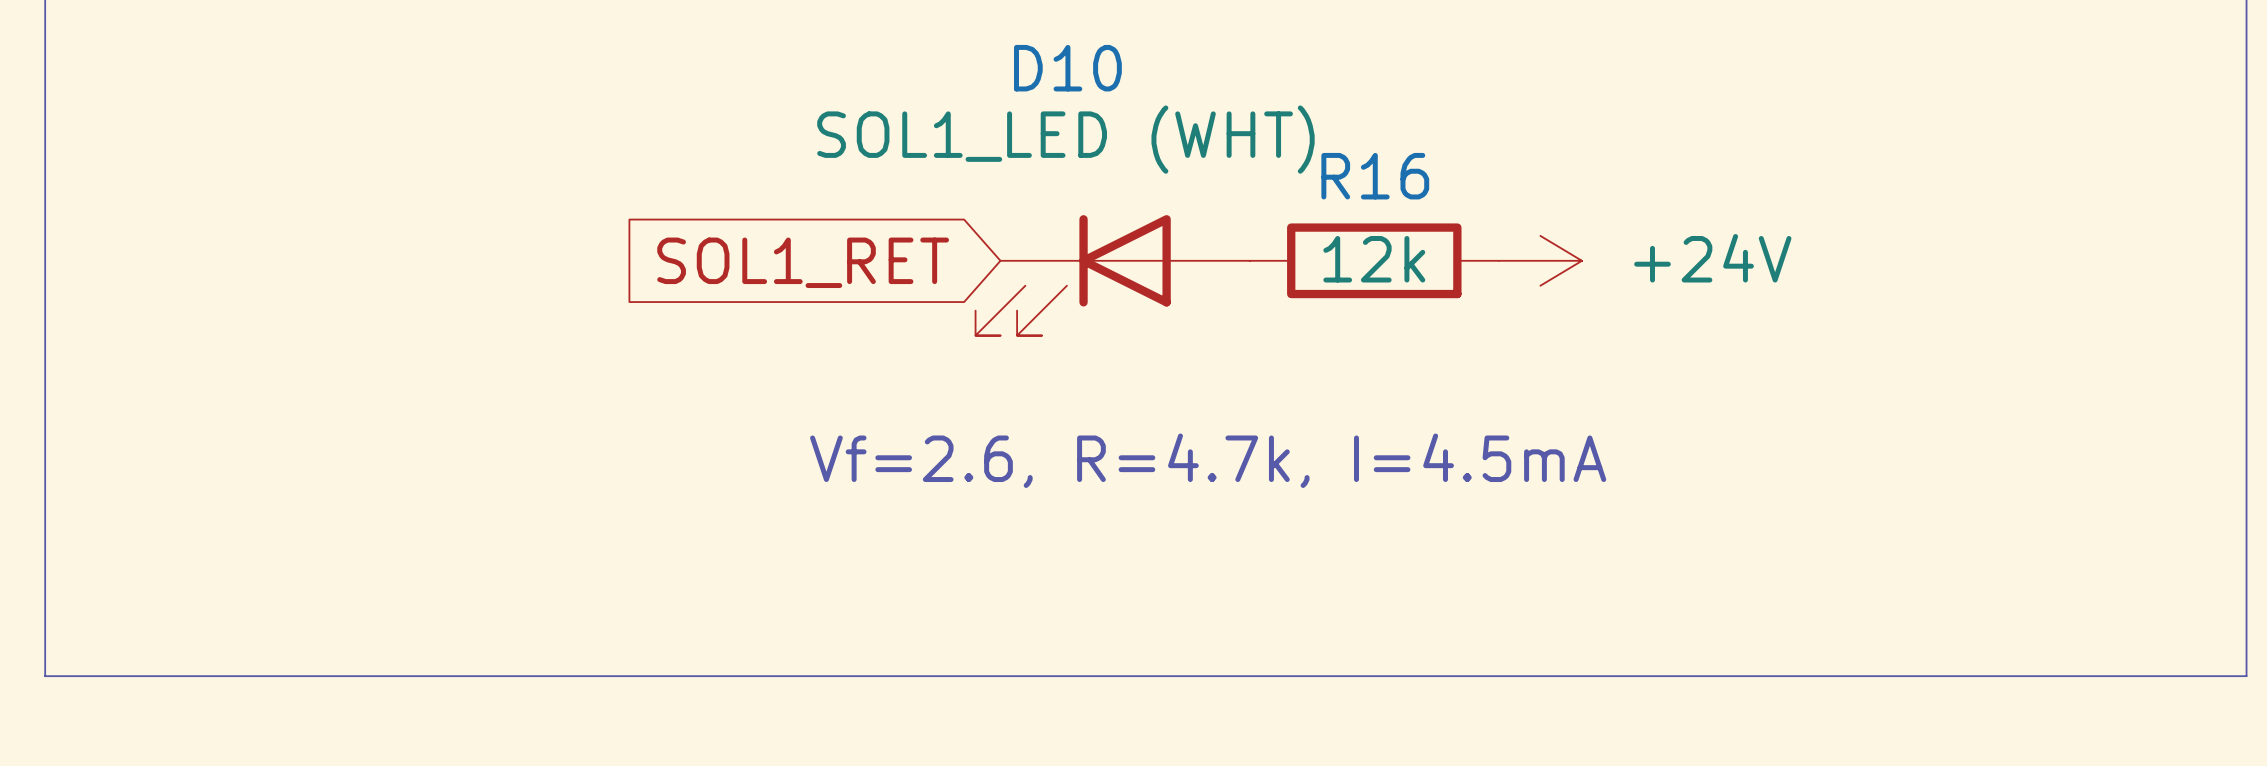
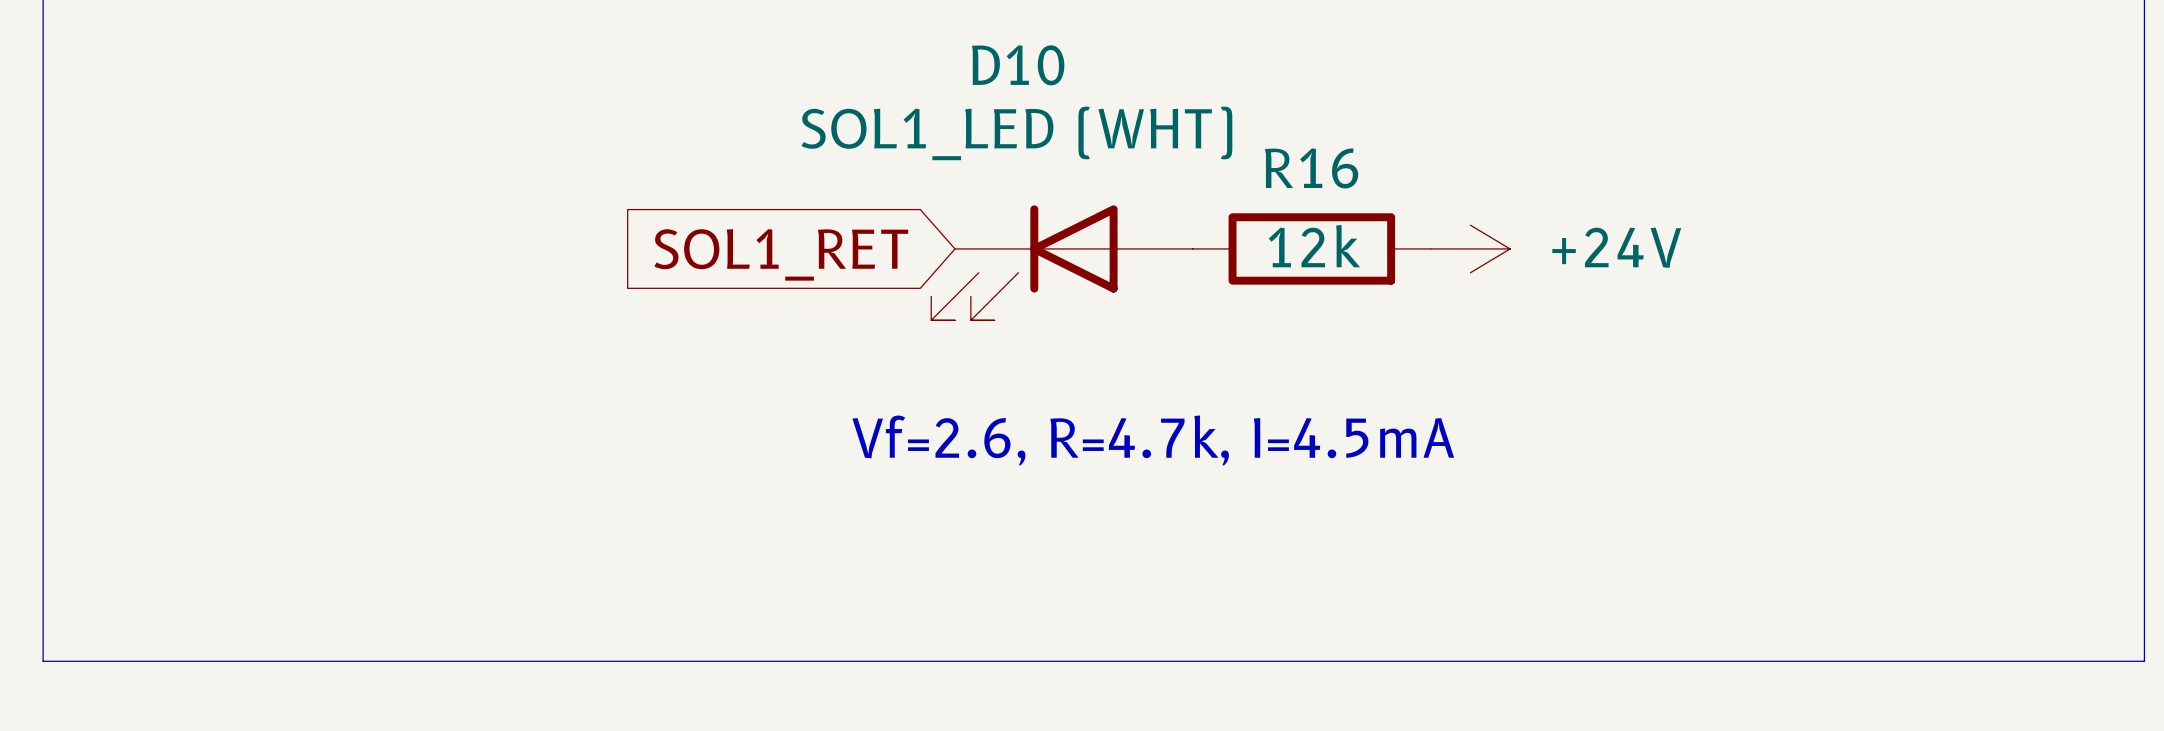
line: (45, 676) (2246, 676) -> (43, 645) (43, 661) (2144, 661) (2144, 645)

